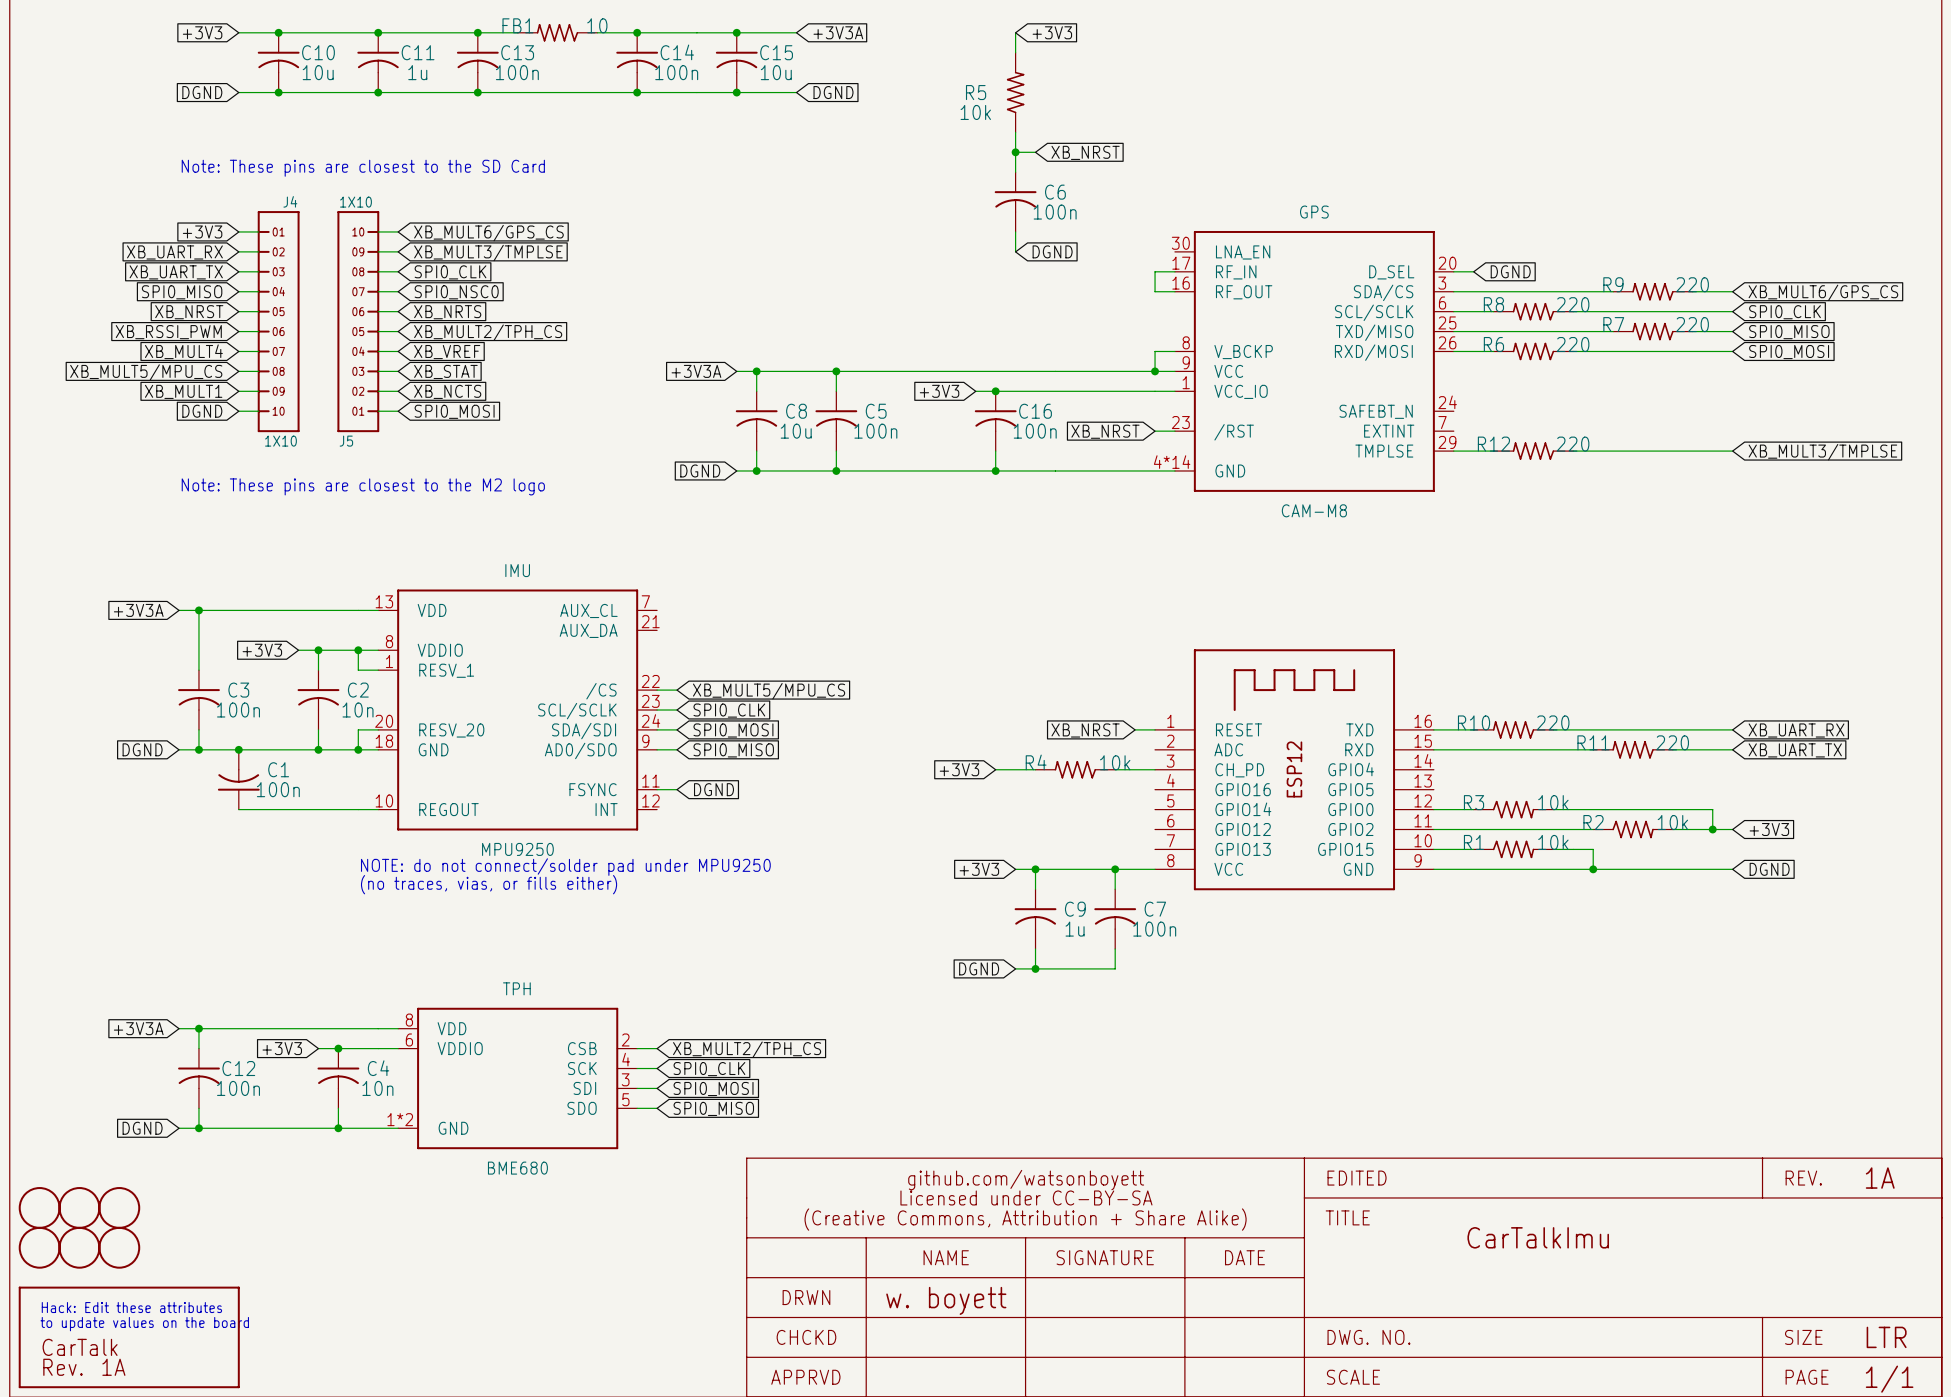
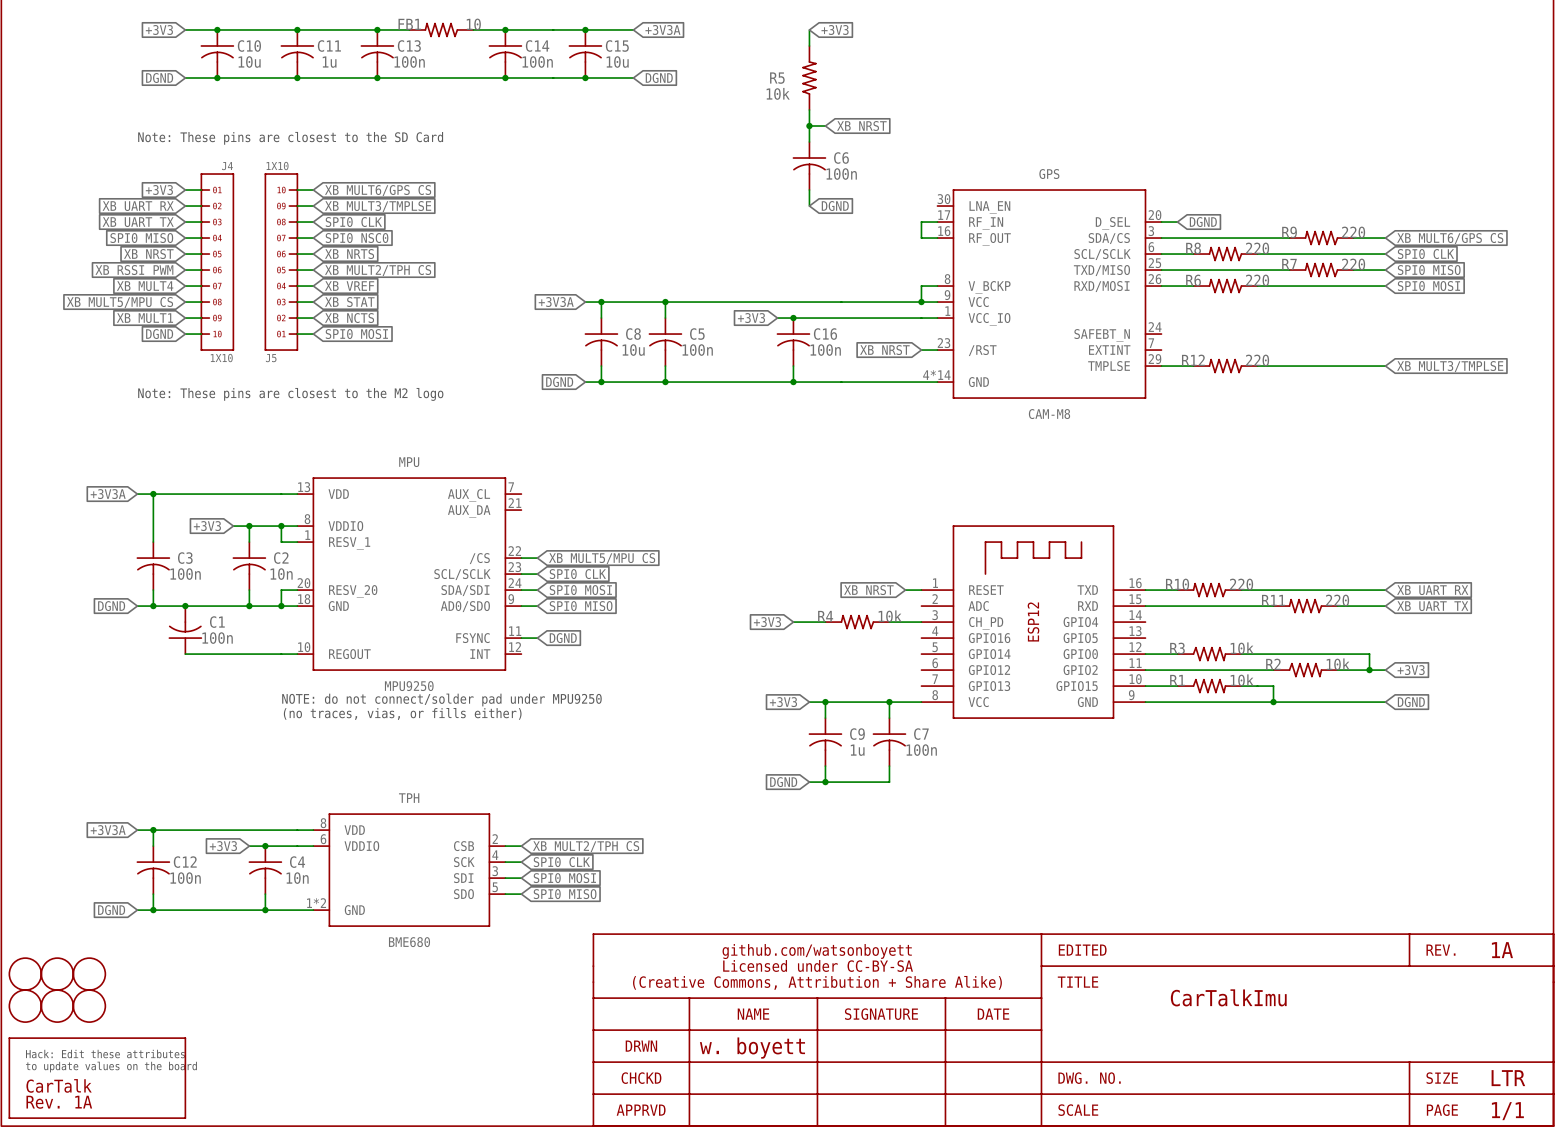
IMU name: IMU (517, 570) -> MPU (409, 462)

